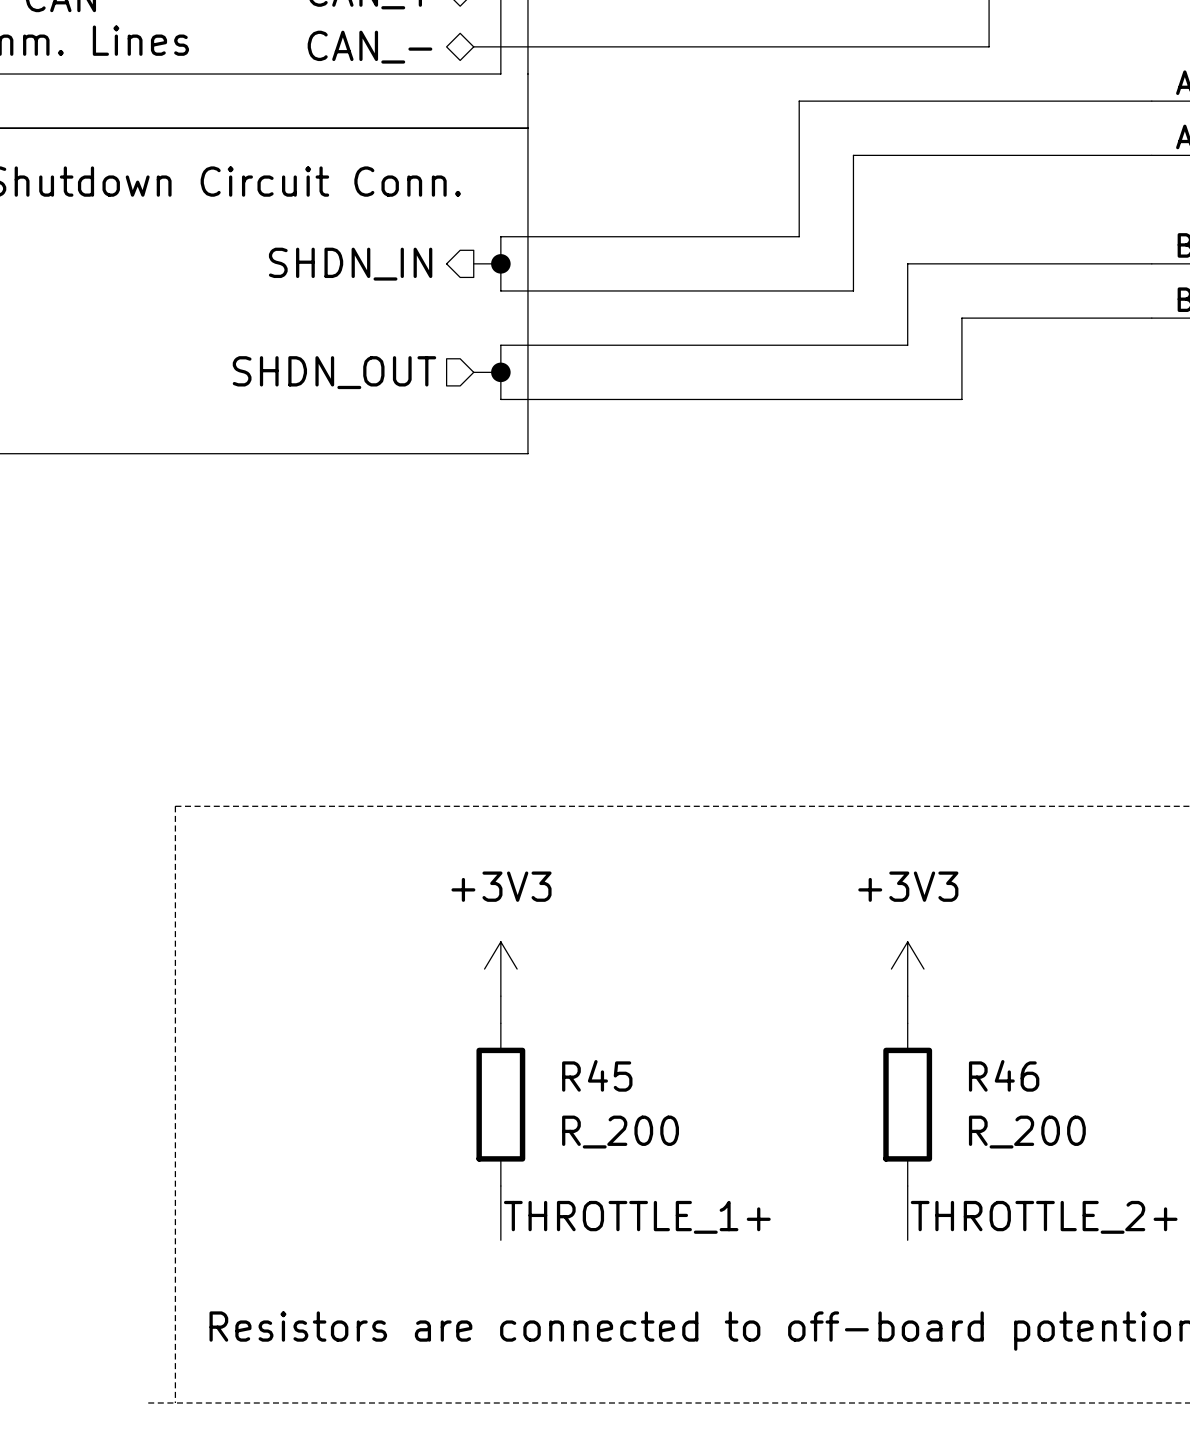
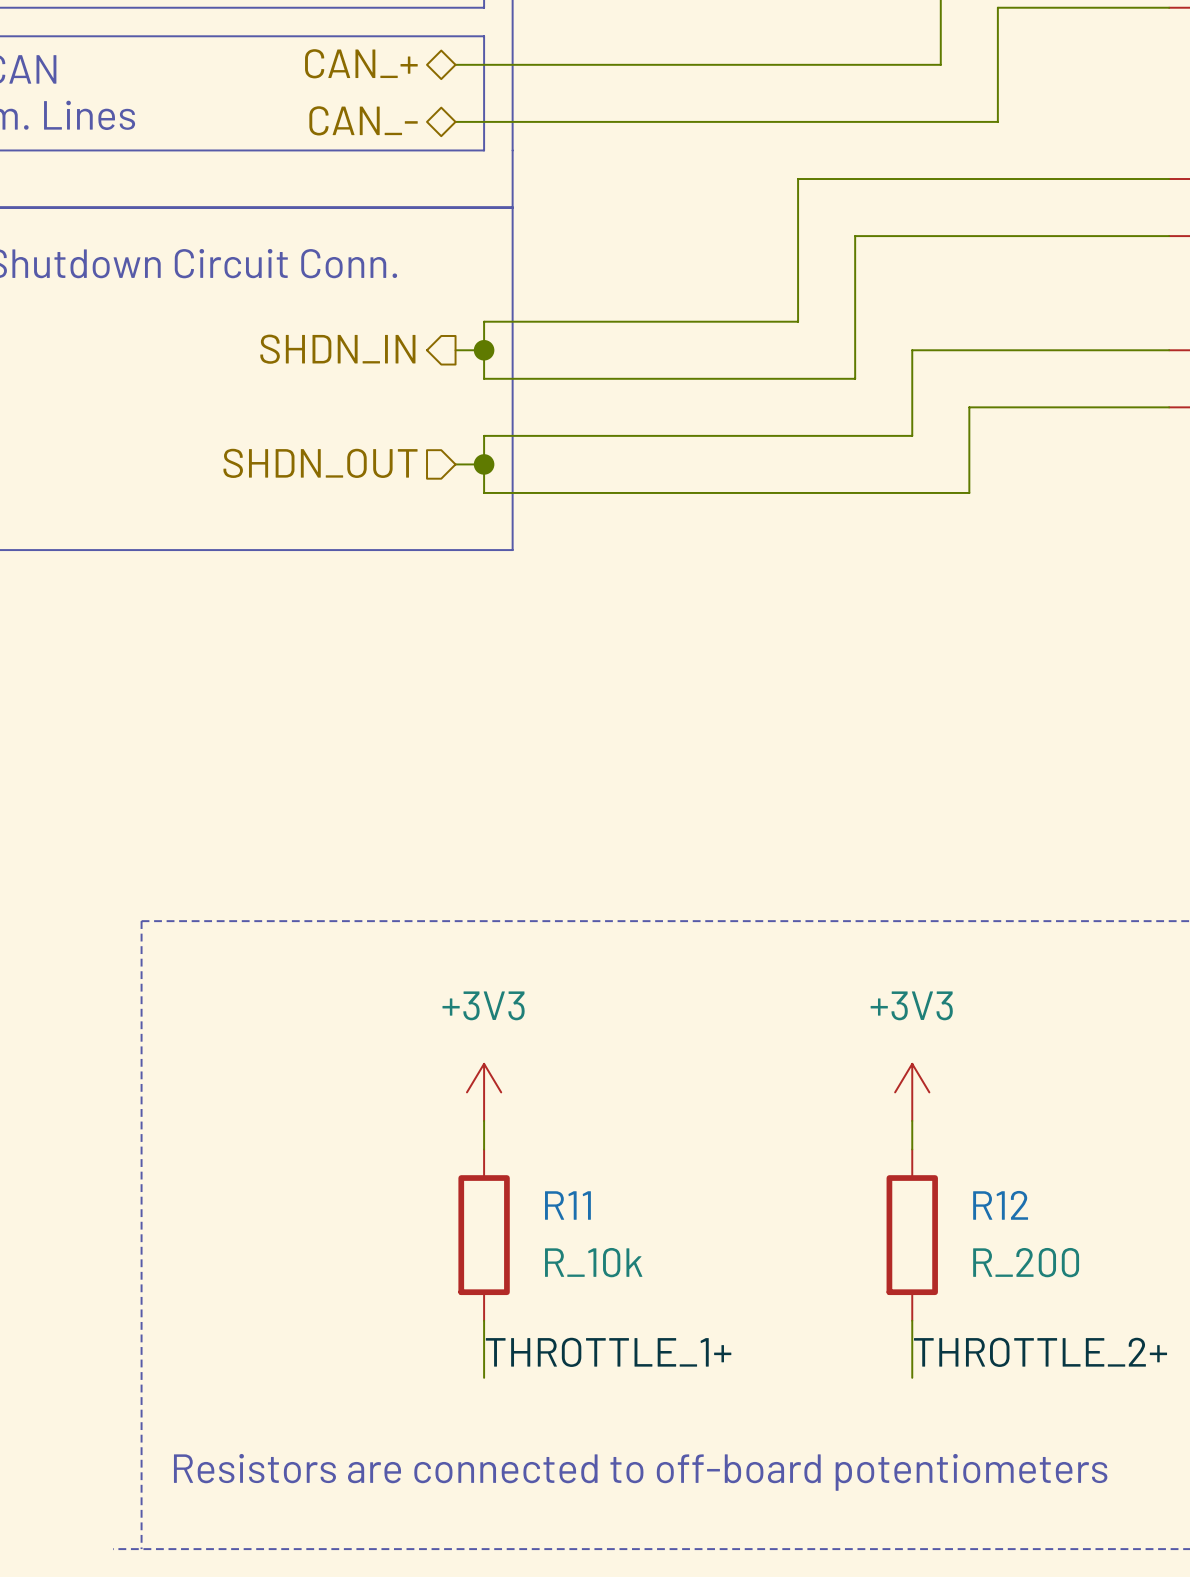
R45 name: R45 (597, 1075) -> R11 (567, 1205)
R46 name: R46 (1004, 1075) -> R12 (1000, 1205)
R45 value: R_200 (620, 1132) -> R_10k (593, 1262)

